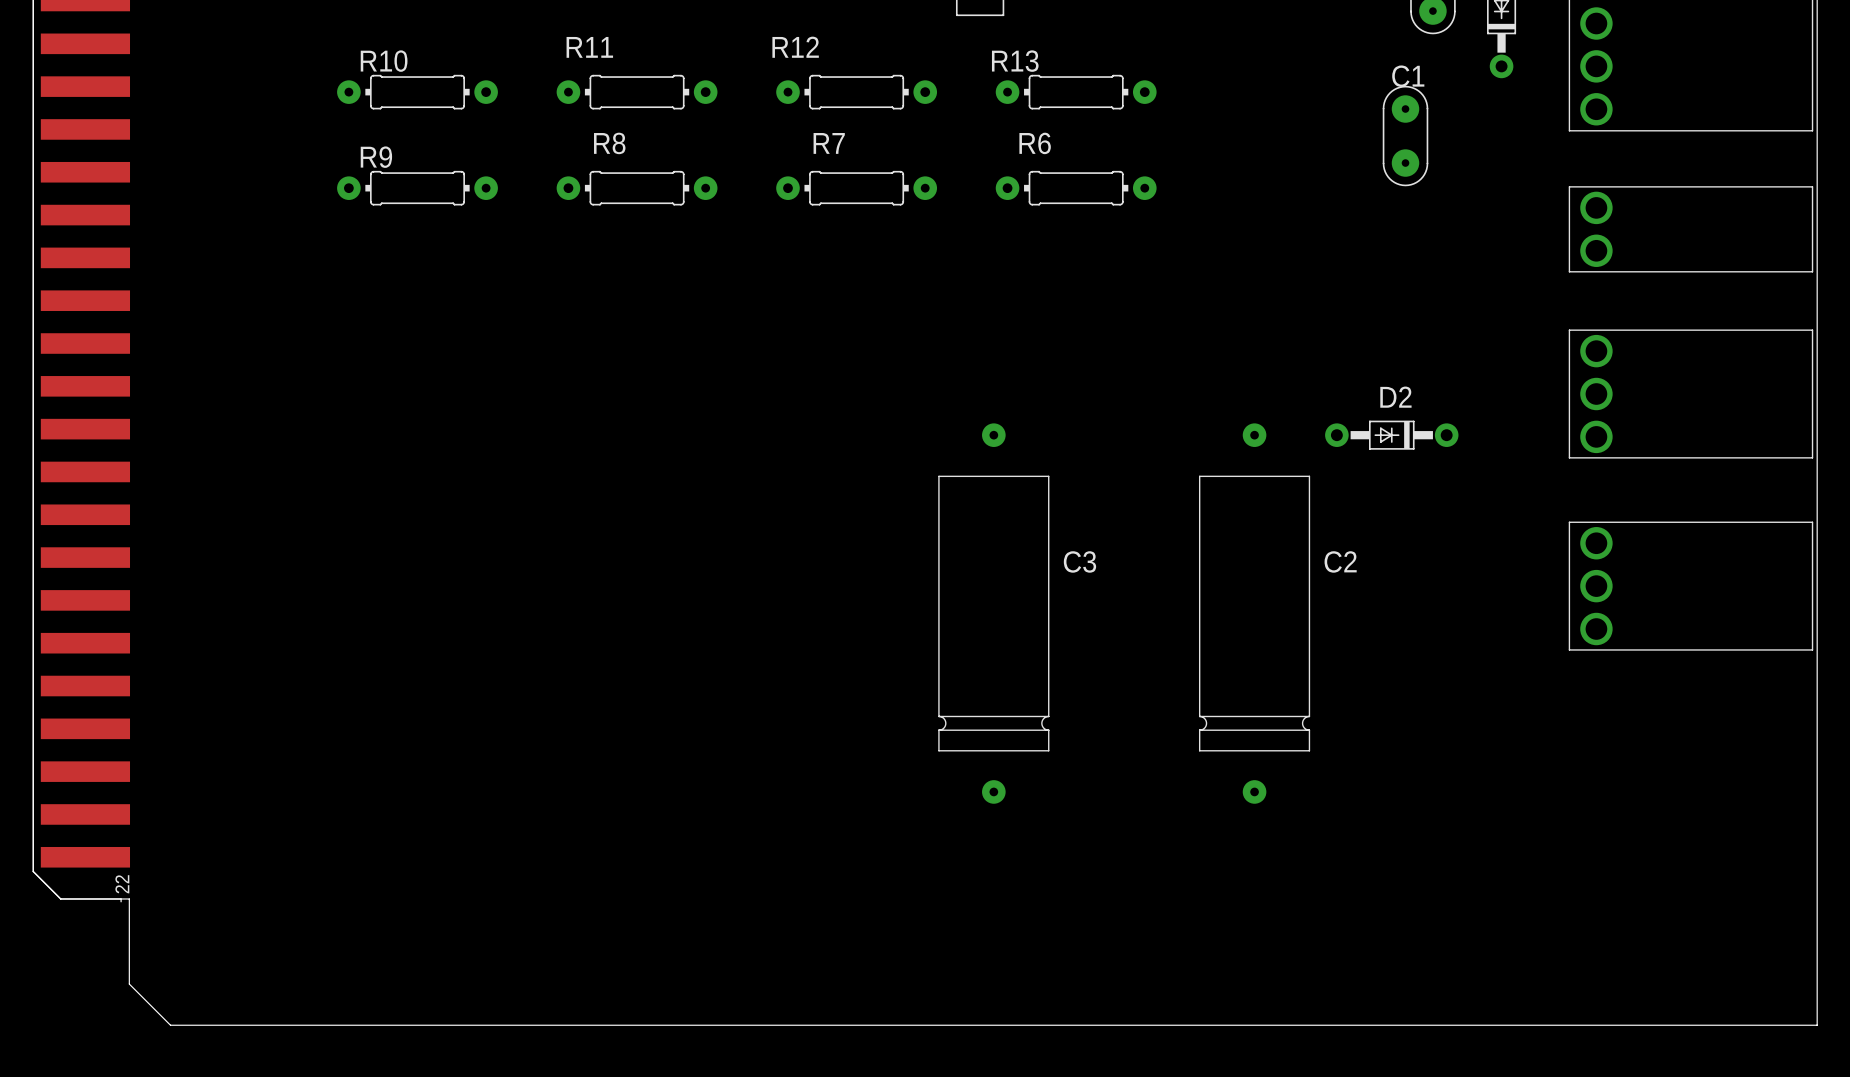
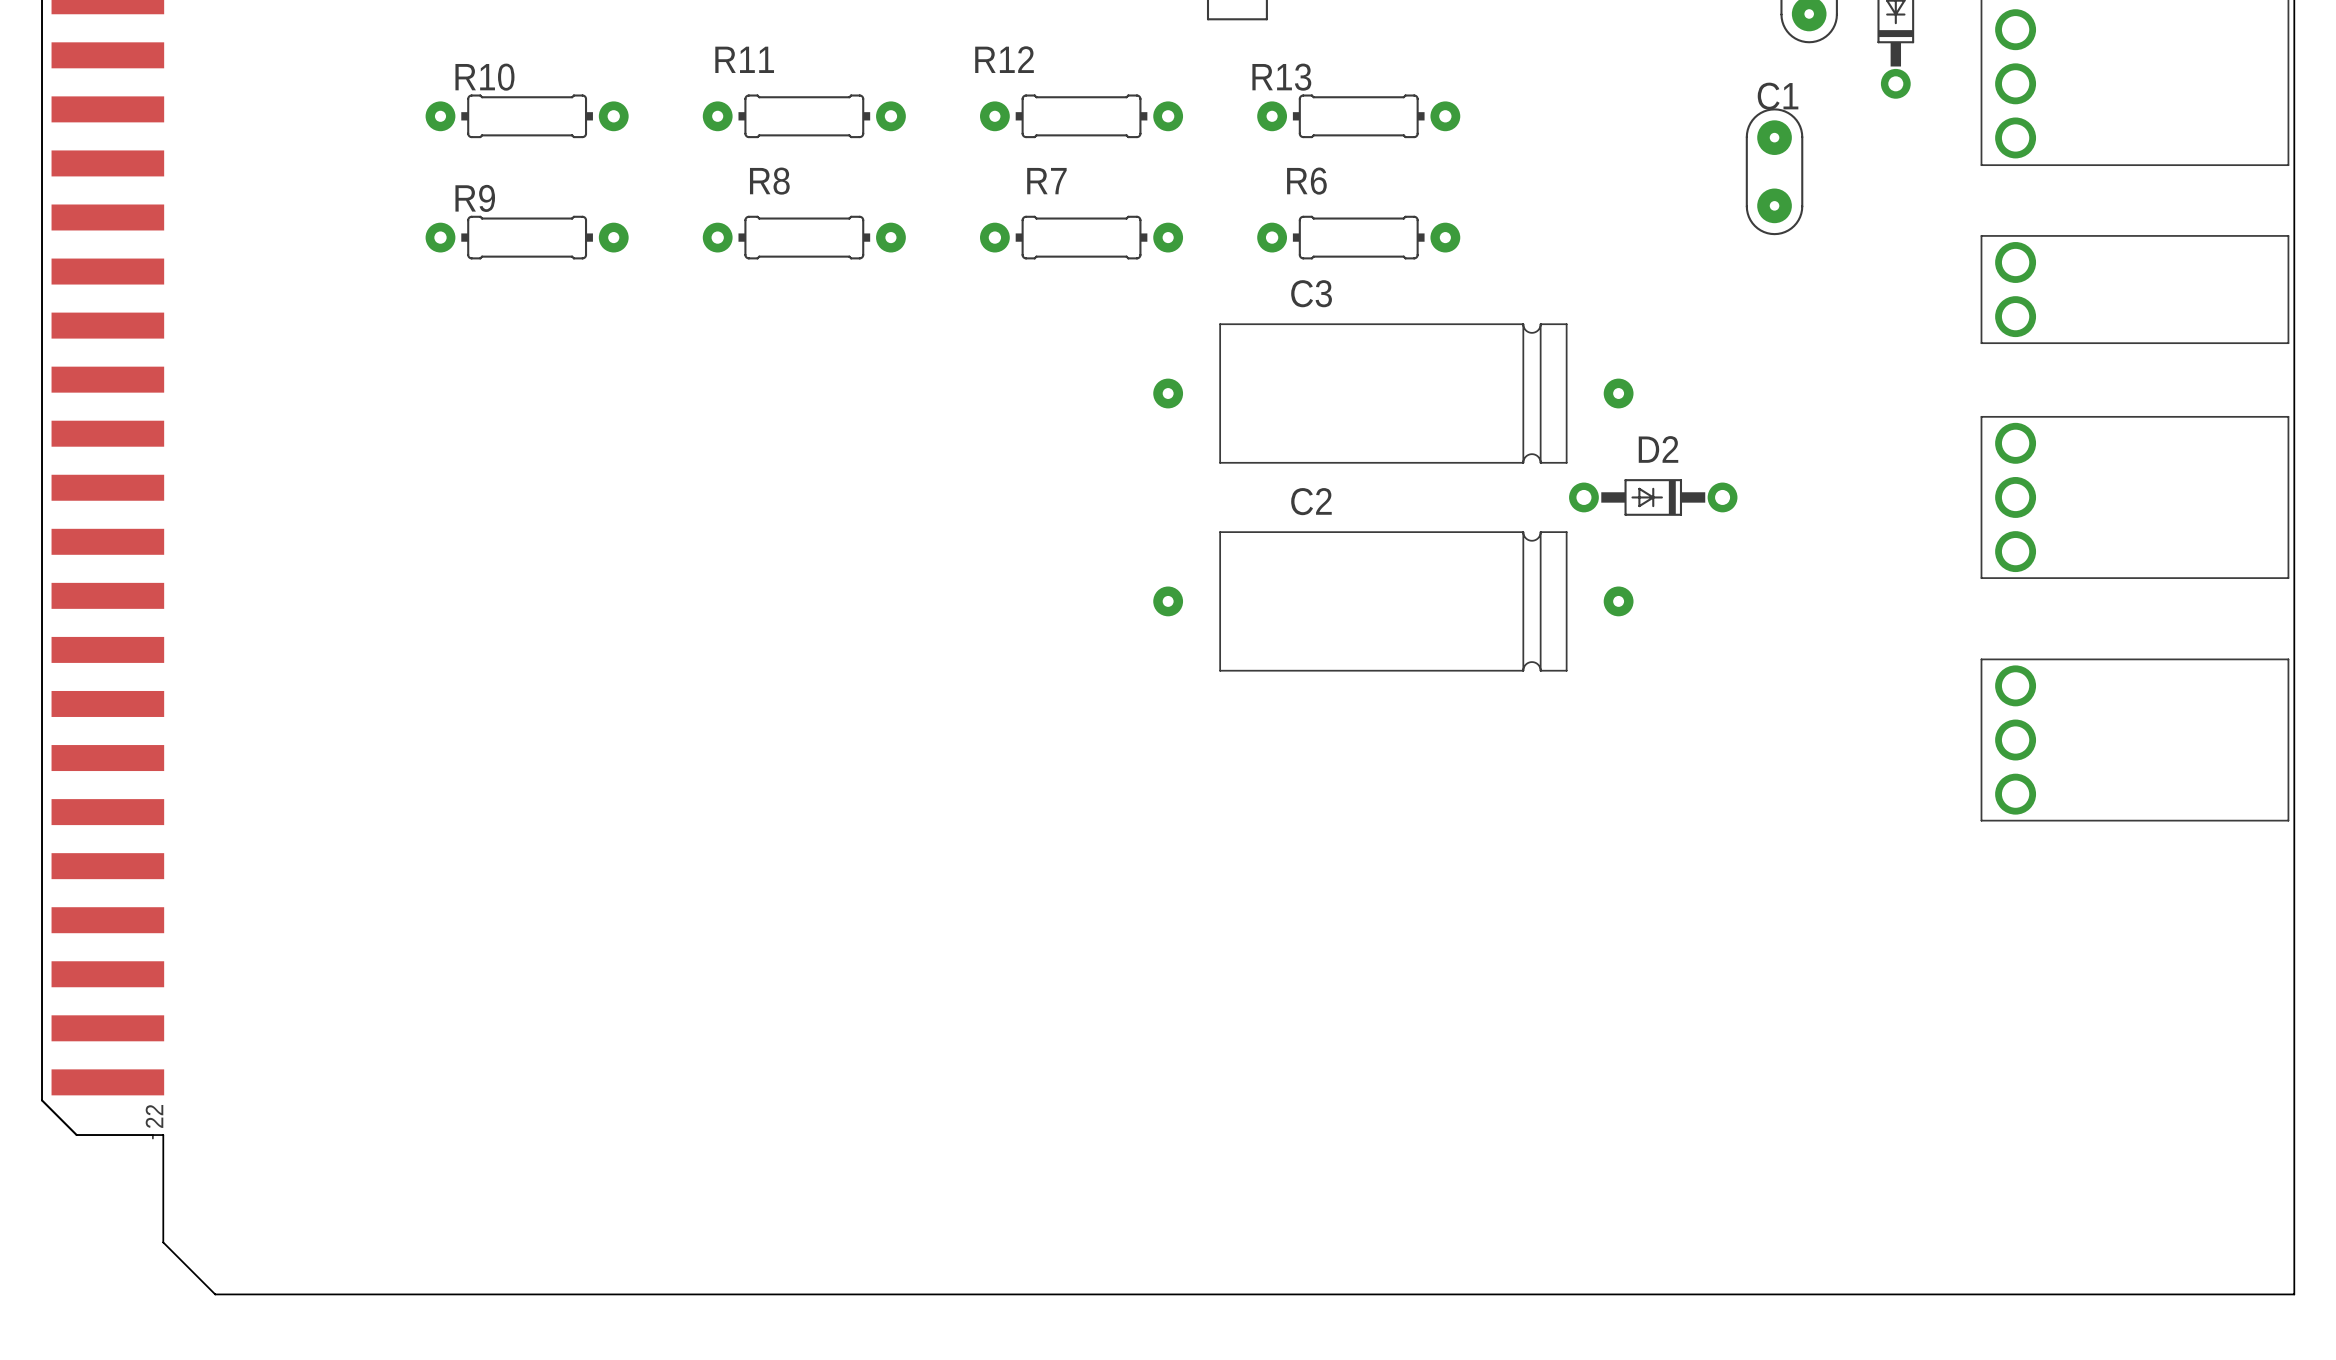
D2 position: (1391, 435) -> (1653, 497)
C3 rotation: 0° (993, 613) -> 90° counterclockwise (1393, 393)
C3 position: (993, 613) -> (1393, 393)
C2 rotation: 0° (1254, 613) -> 90° counterclockwise (1393, 601)

